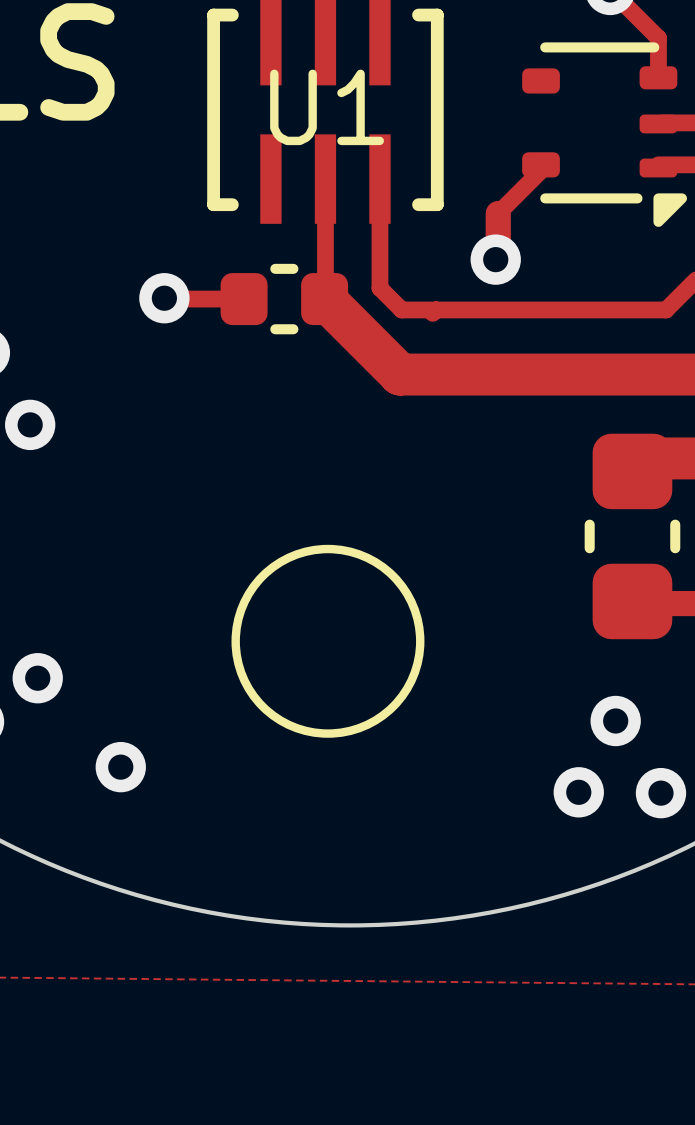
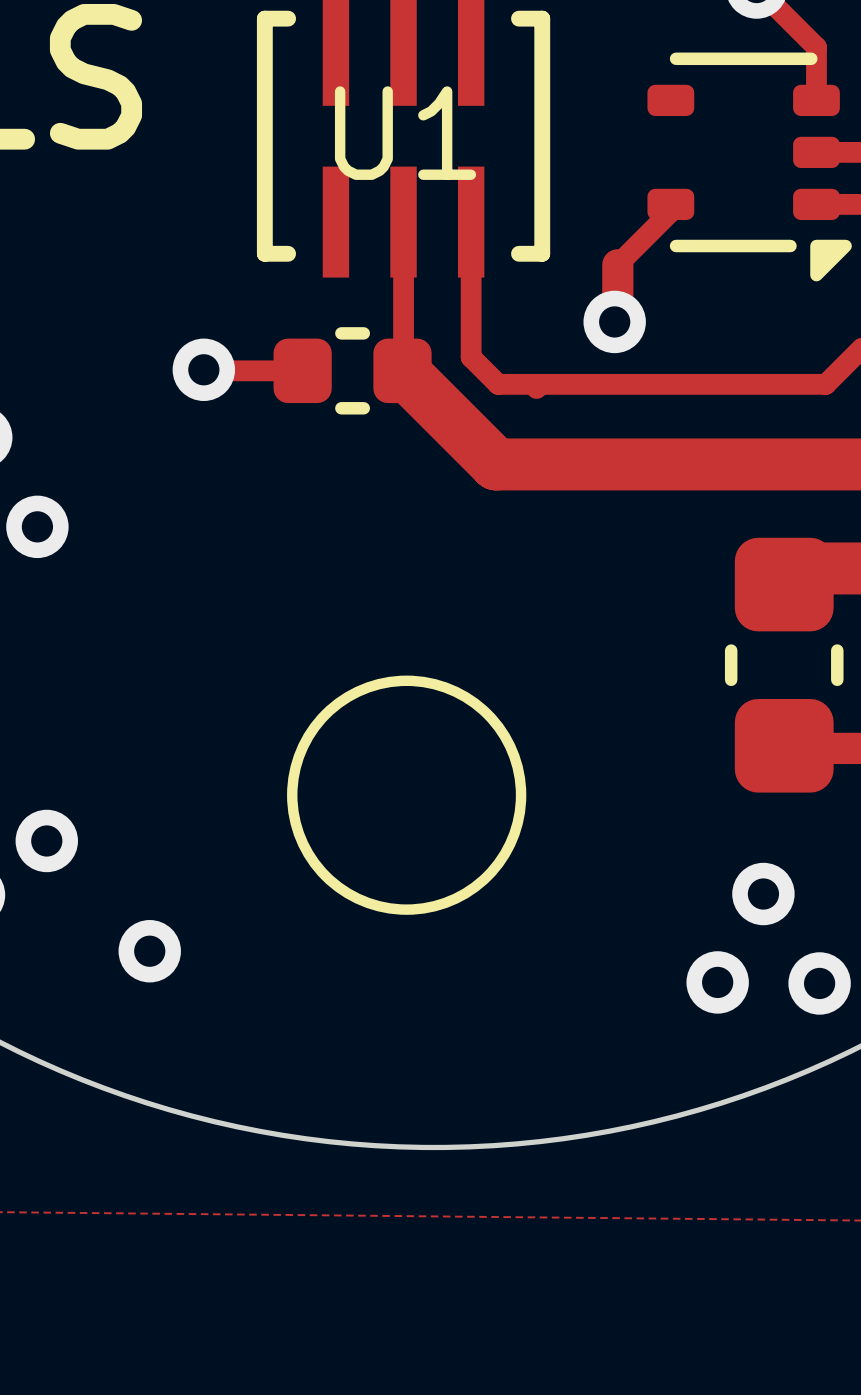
part footprint: [522, 42, 687, 227] -> [647, 52, 852, 282]

